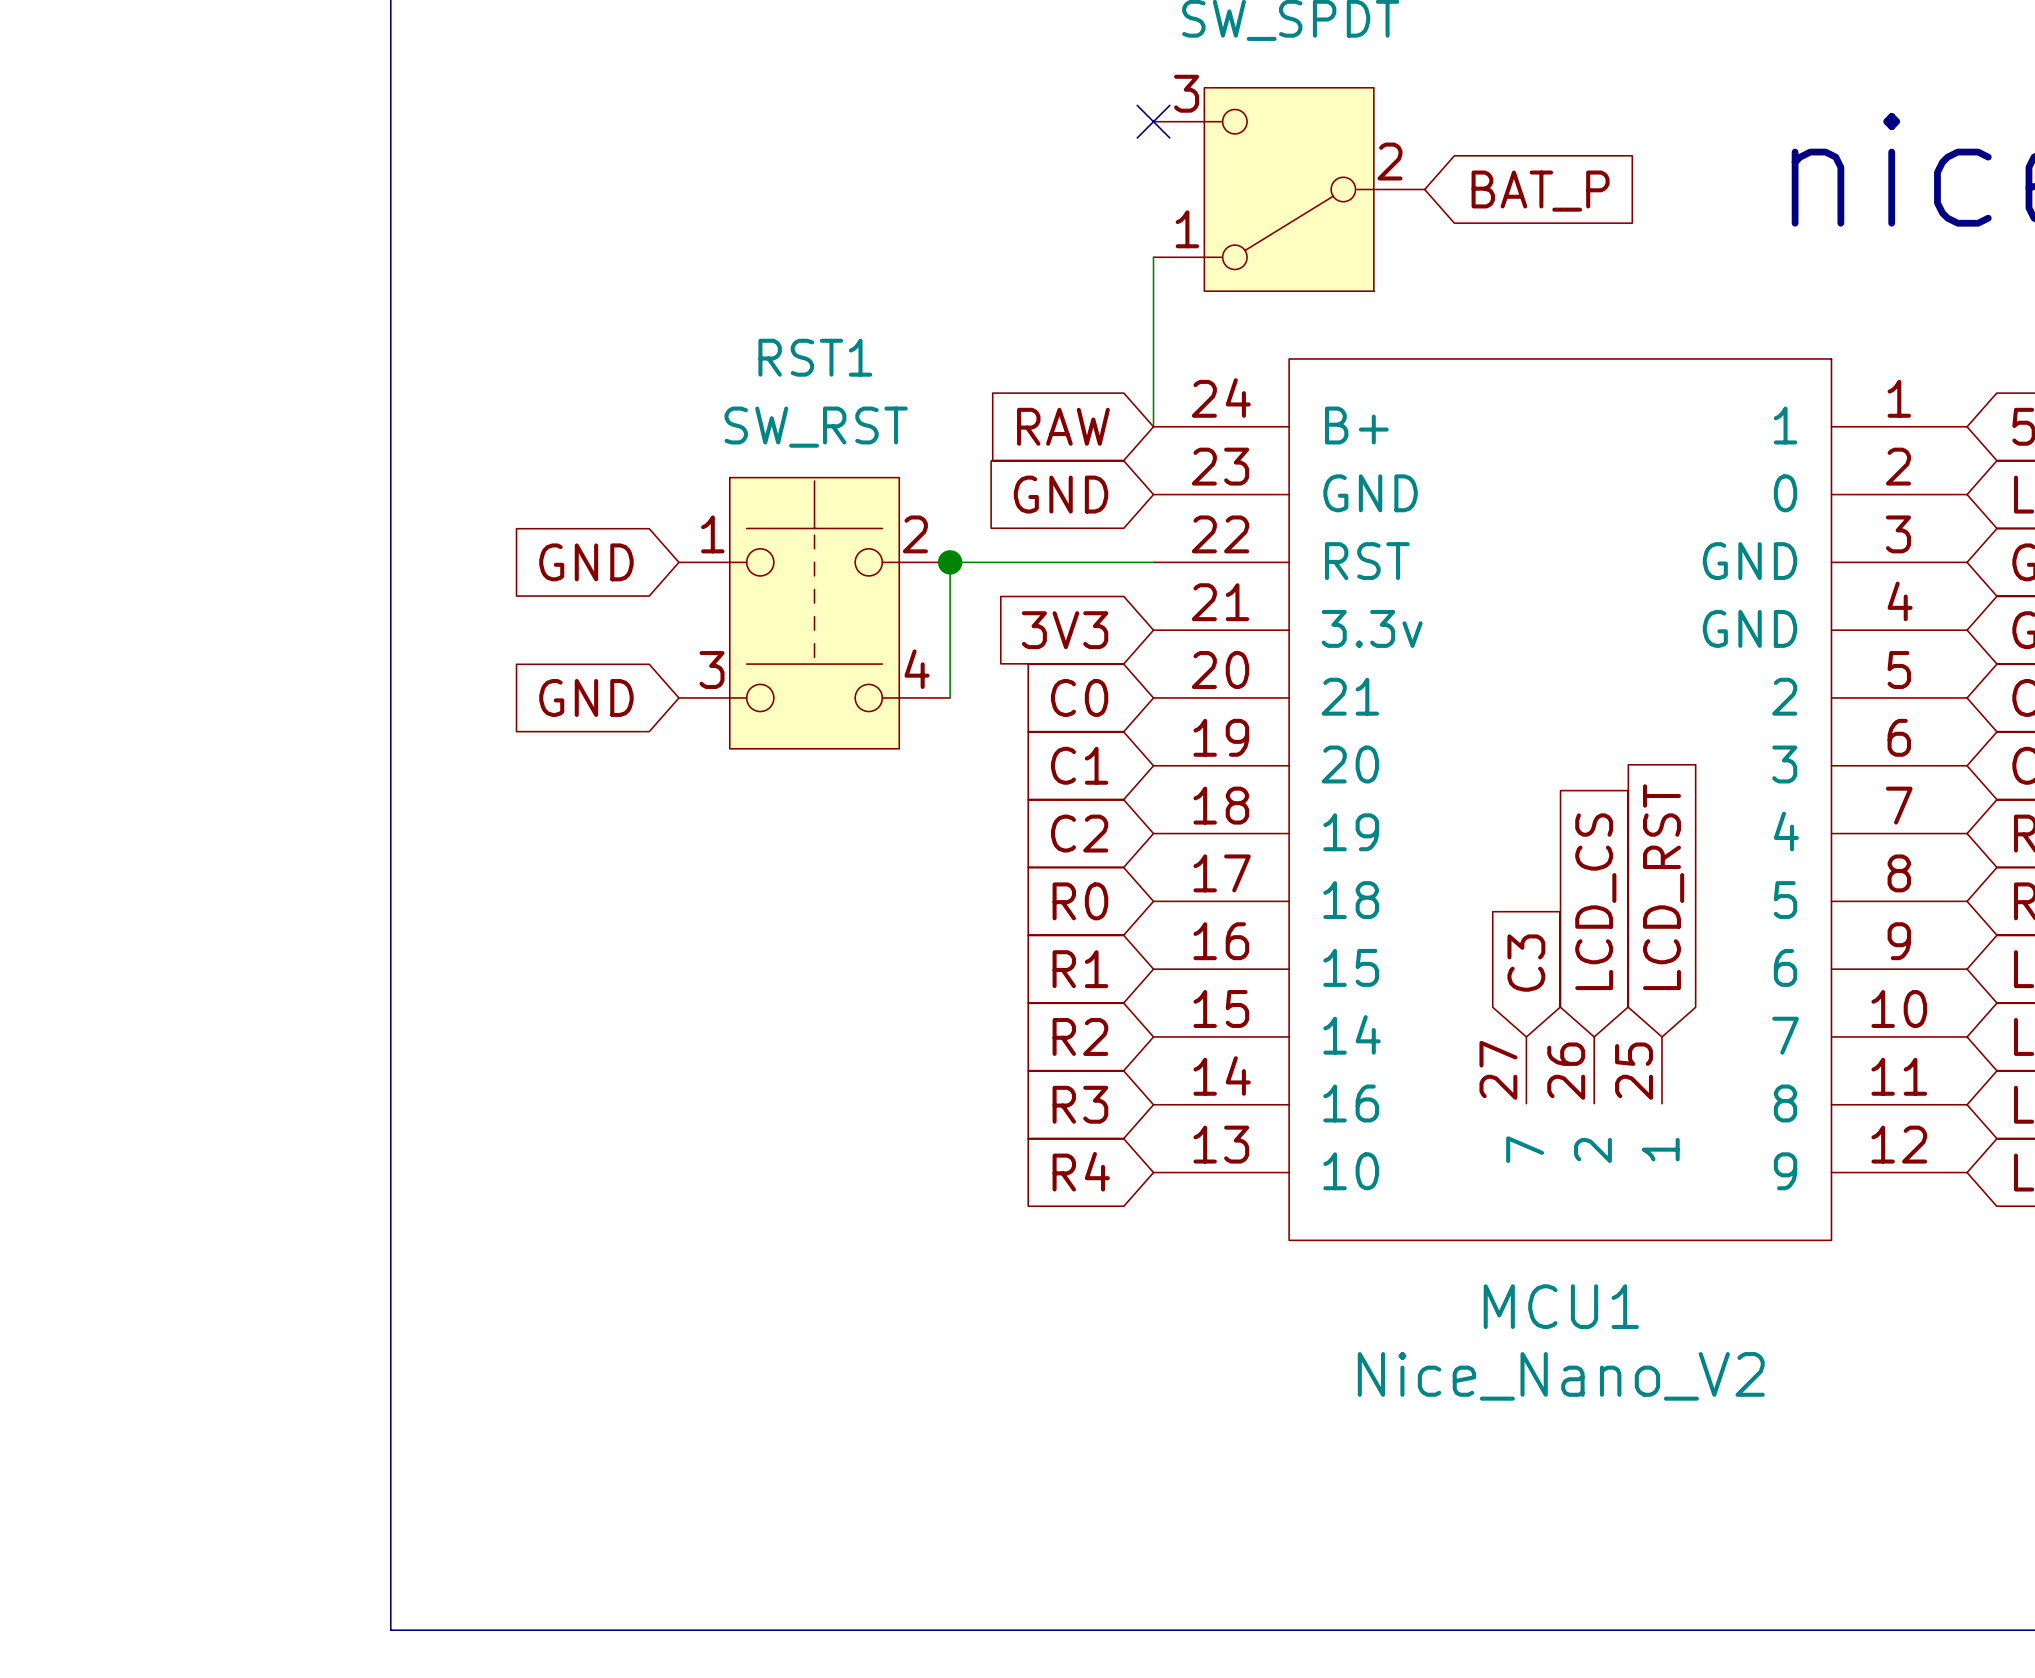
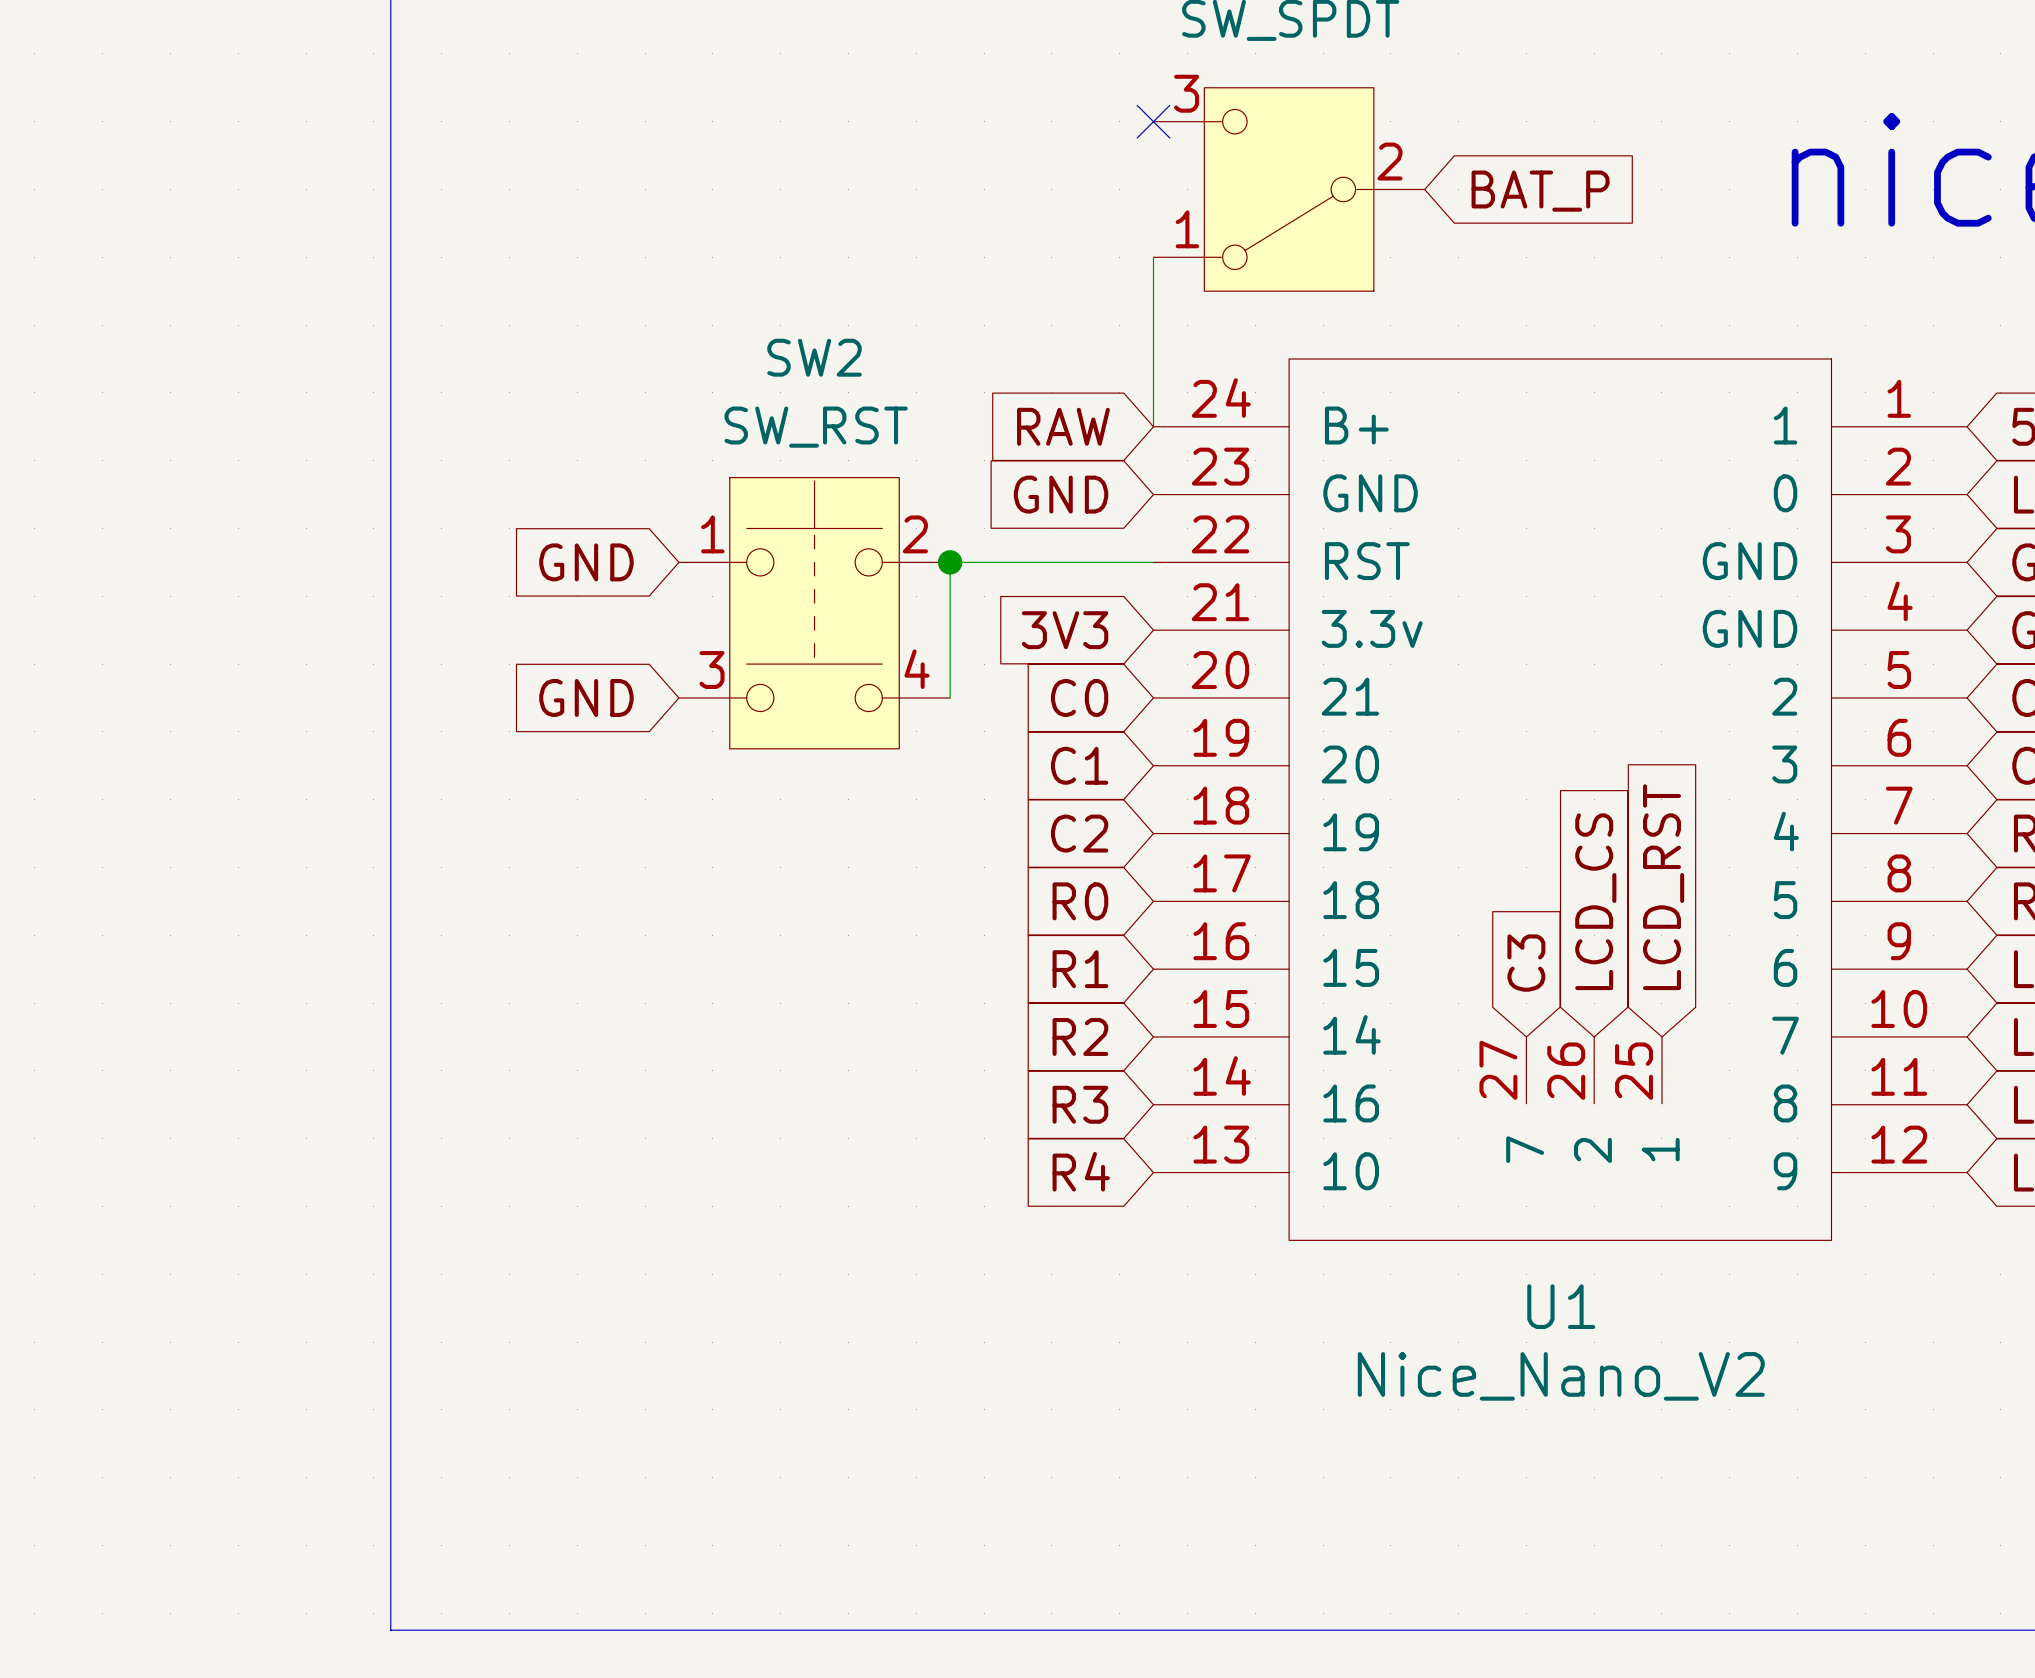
RST1 name: RST1 (815, 357) -> SW2 (814, 357)
MCU1 name: MCU1 (1561, 1306) -> U1 (1561, 1306)

